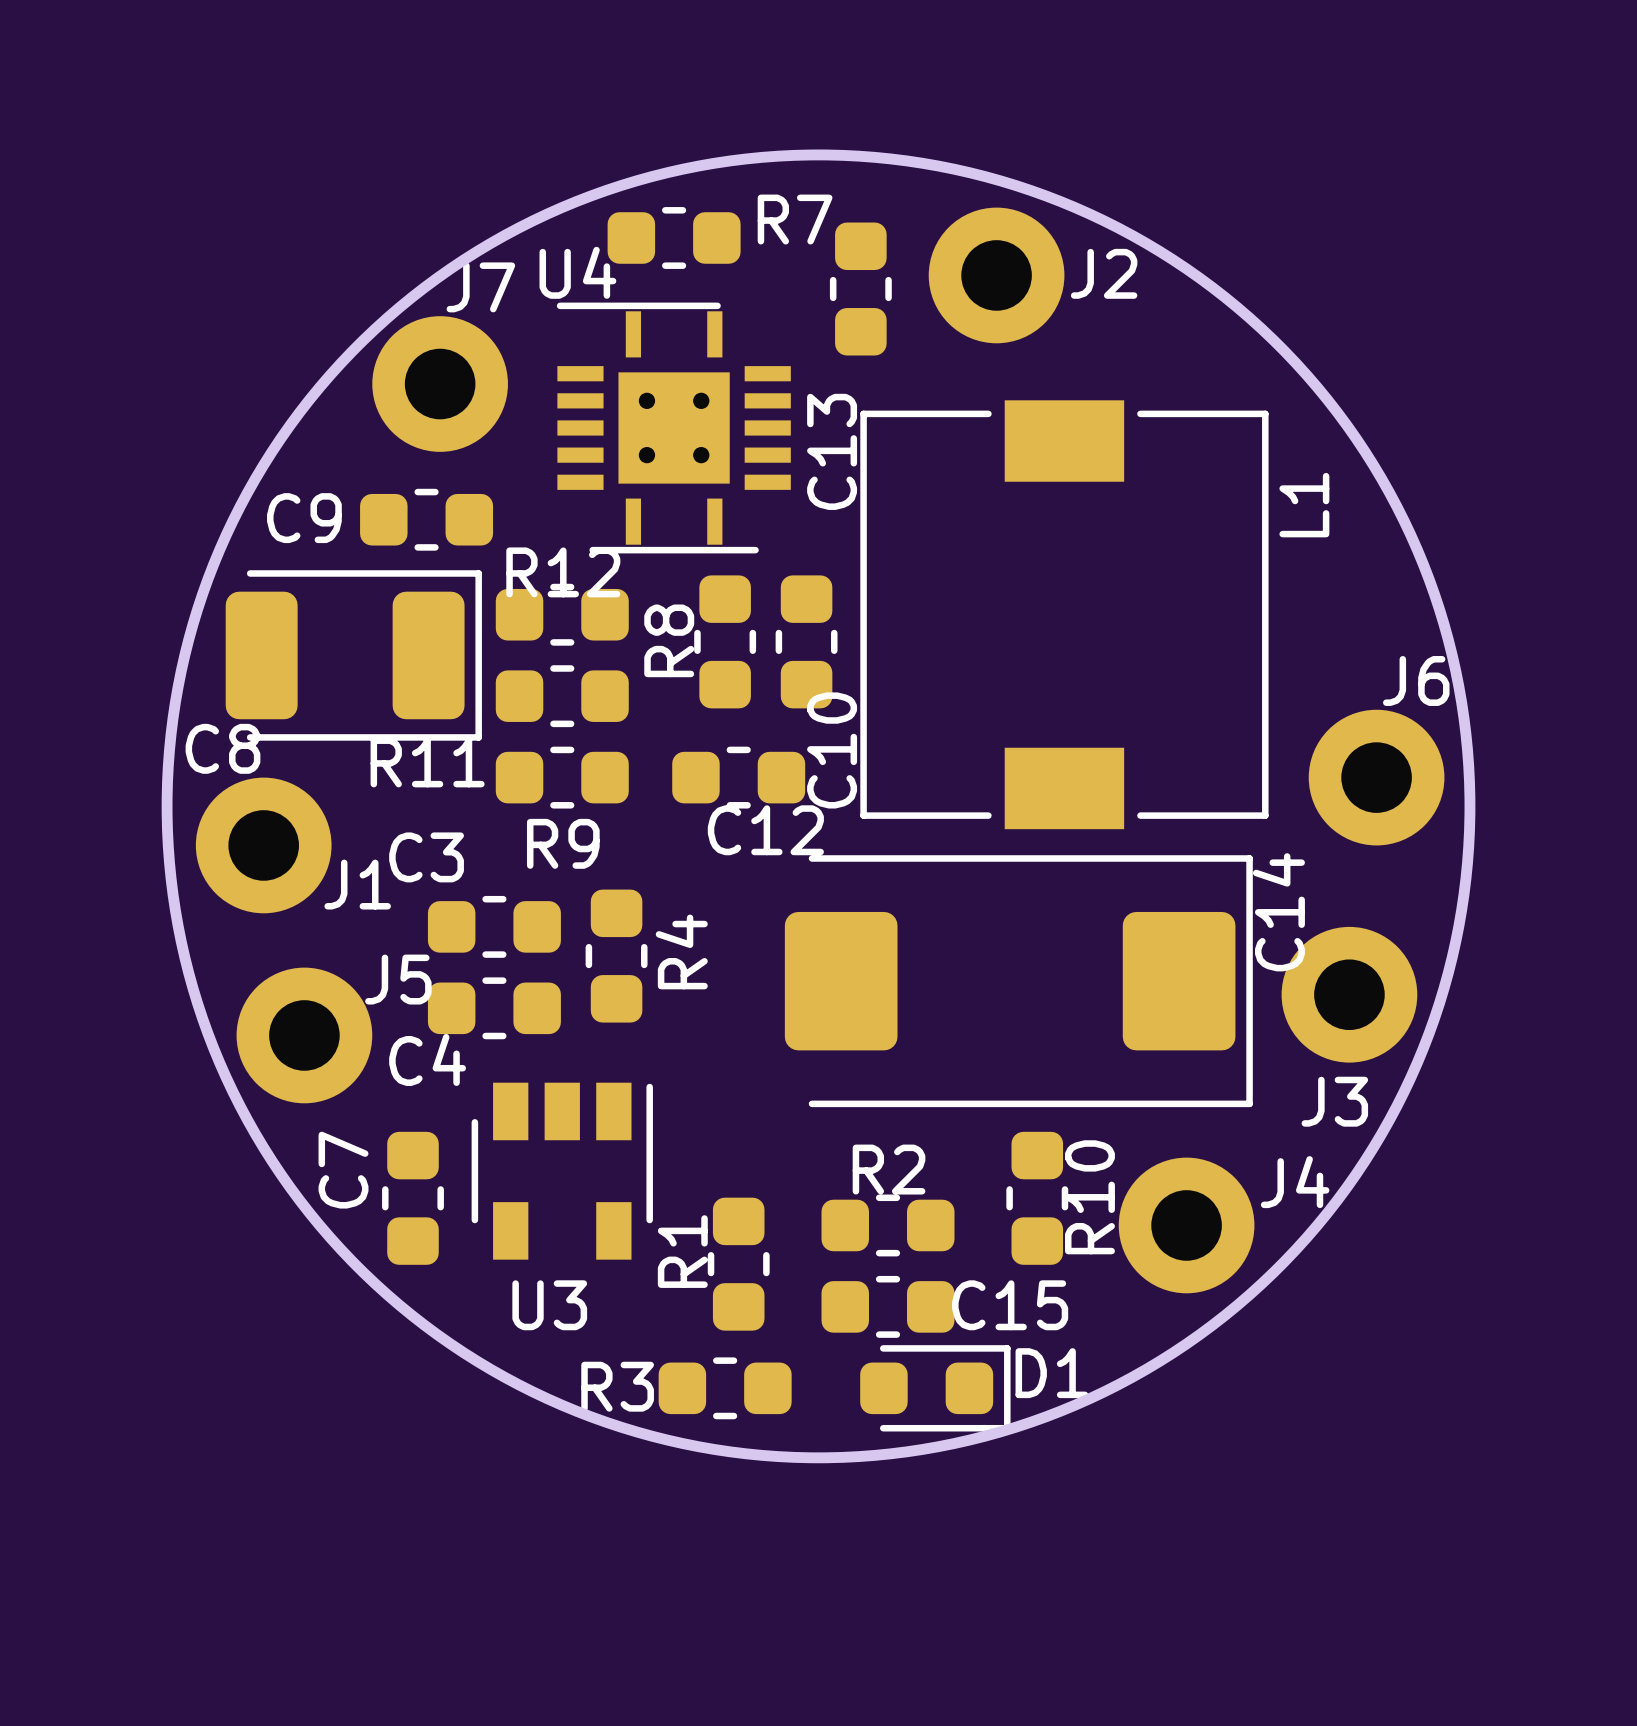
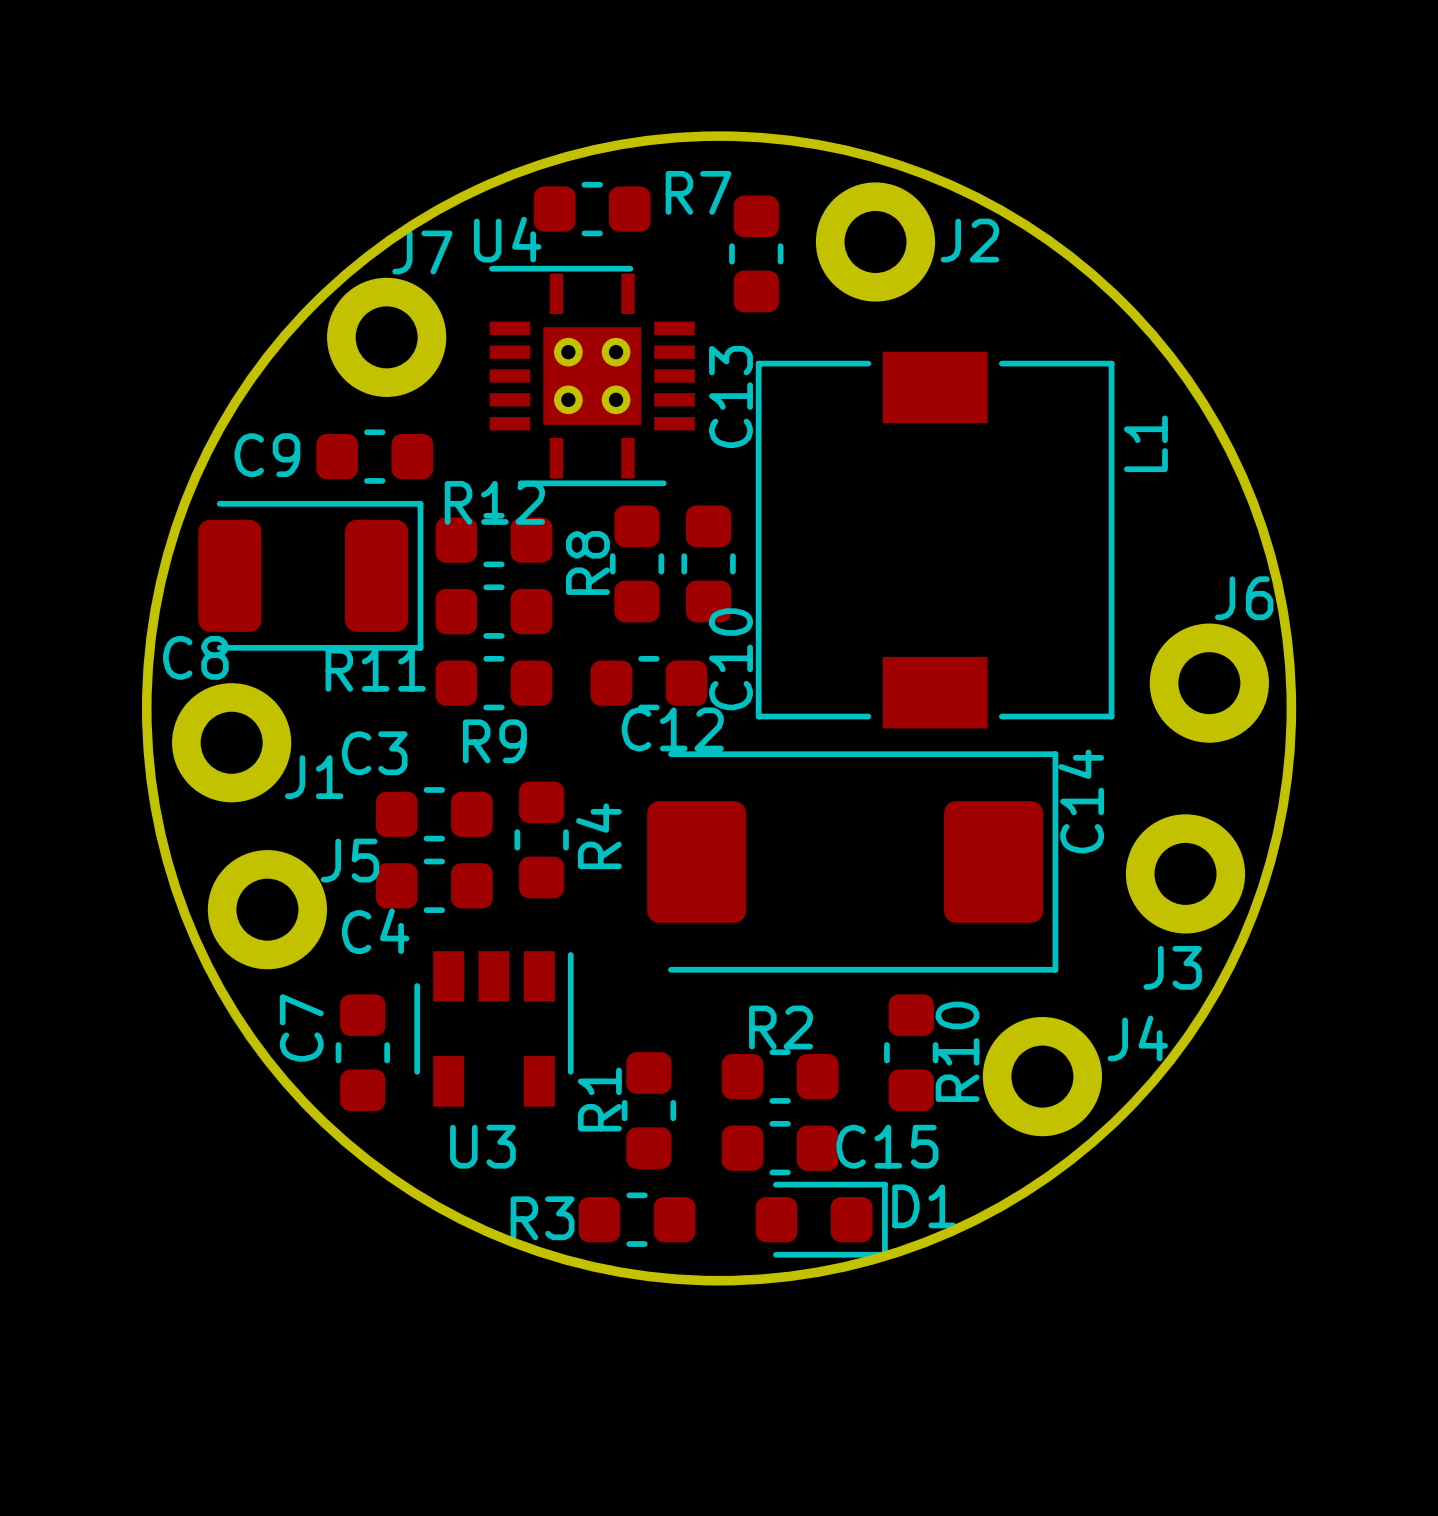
C14 position: (1018, 981) -> (852, 861)

